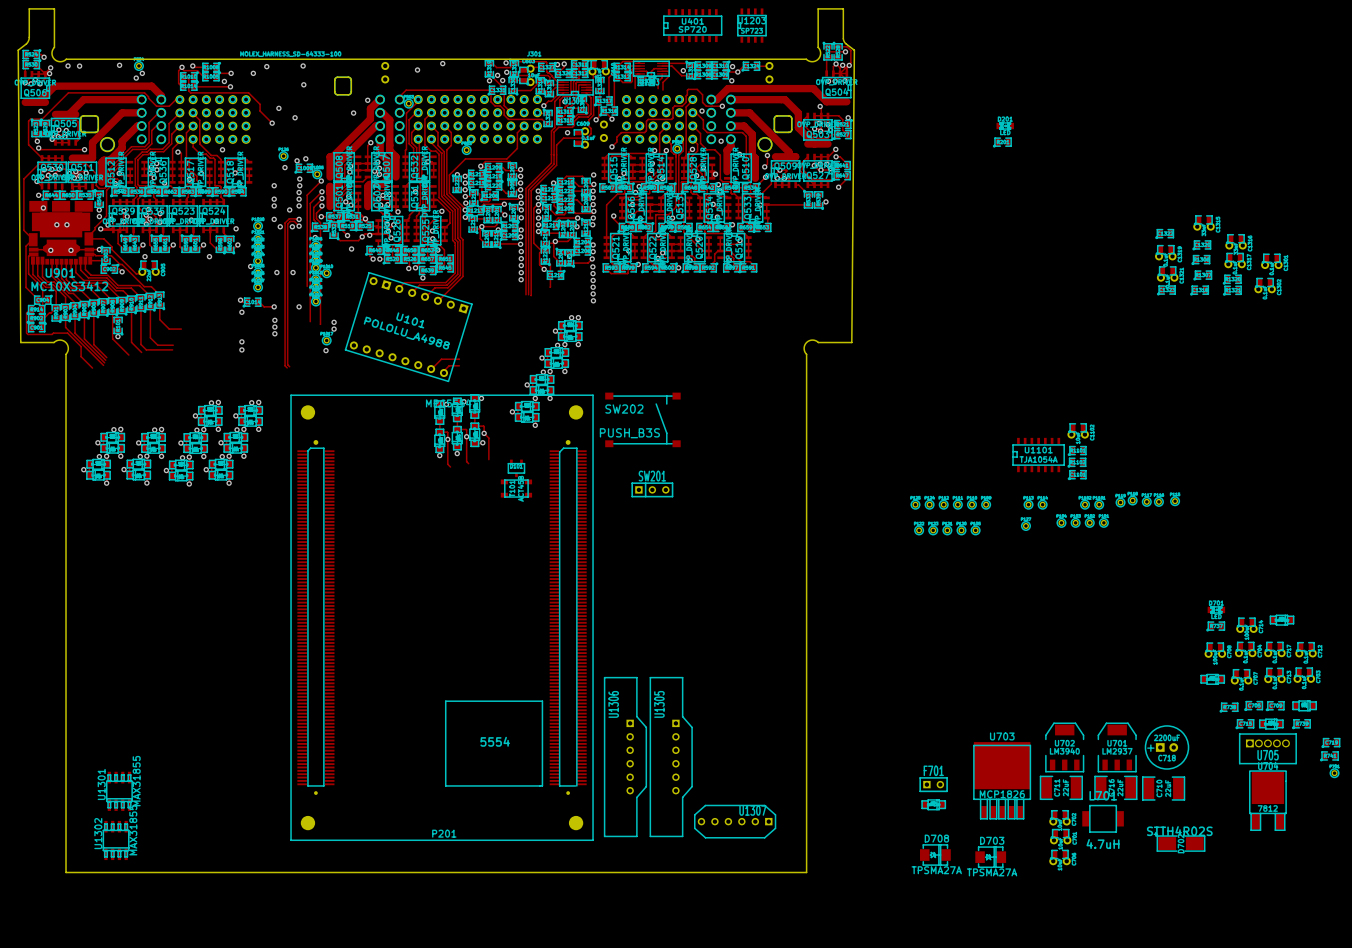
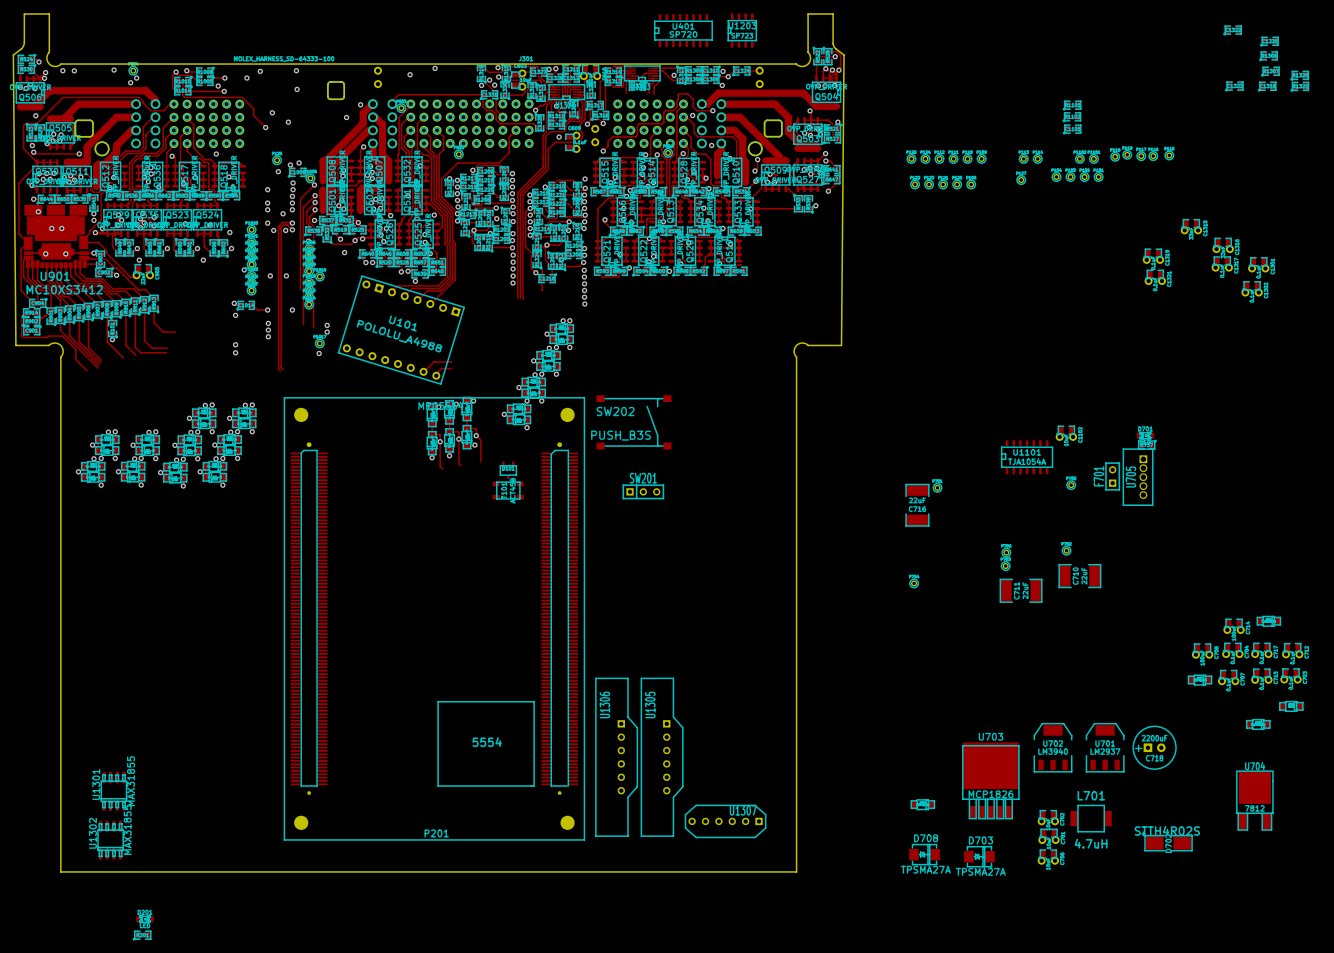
part position: (1005, 125) -> (144, 919)
part position: (1002, 142) -> (142, 935)
part position: (1164, 233) -> (1232, 30)
part position: (1201, 245) -> (1269, 41)
part position: (1200, 259) -> (1268, 56)
part position: (1202, 275) -> (1270, 71)
part position: (1232, 279) -> (1299, 75)
part position: (1166, 290) -> (1234, 86)
part position: (1199, 290) -> (1267, 86)
part position: (1232, 290) -> (1299, 86)
part position: (1077, 450) -> (1072, 105)
part position: (1076, 462) -> (1071, 117)
part position: (1077, 475) -> (1072, 129)
part: none -> (1071, 485)
part position: (1132, 500) -> (1127, 154)
part position: (1146, 501) -> (1141, 156)
part position: (1158, 501) -> (1153, 156)
part position: (1175, 501) -> (1169, 155)
part position: (1120, 502) -> (1115, 156)
part position: (915, 504) -> (911, 158)
part position: (929, 504) -> (925, 158)
part position: (943, 504) -> (939, 158)
part position: (957, 504) -> (953, 158)
part position: (971, 504) -> (967, 158)
part position: (986, 504) -> (981, 158)
part position: (1028, 504) -> (1023, 158)
part position: (1042, 504) -> (1037, 158)
part position: (1085, 504) -> (1079, 158)
part position: (1099, 504) -> (1093, 158)
part position: (1061, 522) -> (1056, 177)
part position: (1075, 522) -> (1070, 177)
part position: (1089, 522) -> (1084, 177)
part position: (1103, 522) -> (1098, 177)
part position: (1025, 525) -> (1021, 180)
part position: (919, 530) -> (915, 184)
part position: (933, 530) -> (929, 184)
part position: (947, 530) -> (943, 184)
part position: (961, 530) -> (957, 184)
part position: (975, 530) -> (971, 184)
part: none -> (1066, 550)
part: none -> (1006, 552)
part: none -> (1005, 566)
part: none -> (914, 583)
part position: (1216, 609) -> (1145, 435)
part rotation: 0° (1215, 626) -> 180° (1147, 444)
part position: (1215, 626) -> (1147, 444)
part: (1253, 705) -> none
part: (1275, 706) -> none
part: (1229, 707) -> none
part: (1244, 724) -> none
part: (1301, 724) -> none
part: (1330, 742) -> none
U705 rotation: 0° (1267, 748) -> 90° clockwise (1138, 477)
U705 position: (1267, 748) -> (1138, 477)
part: (1329, 756) -> none
part position: (1334, 773) -> (937, 487)
F701 rotation: 0° (933, 784) -> 90° counterclockwise (1112, 476)
F701 position: (933, 784) -> (1112, 476)
part position: (1061, 787) -> (1021, 590)
part rotation: 0° (1115, 787) -> 90° clockwise (917, 505)
part position: (1115, 787) -> (917, 505)
part position: (1163, 788) -> (1079, 576)

